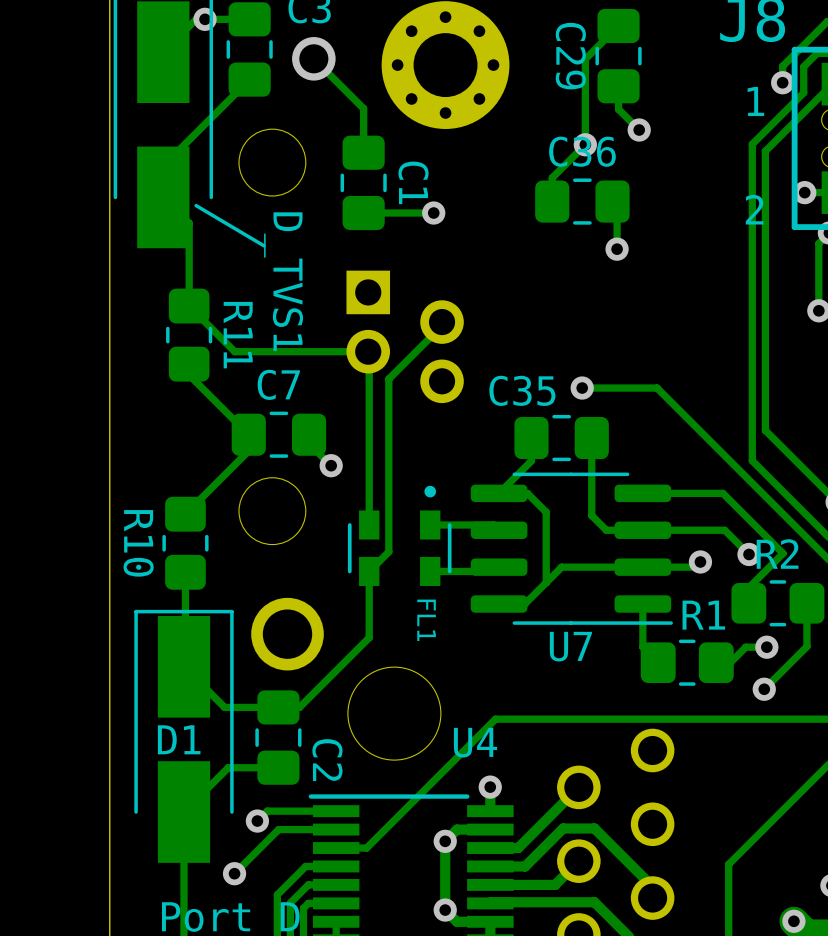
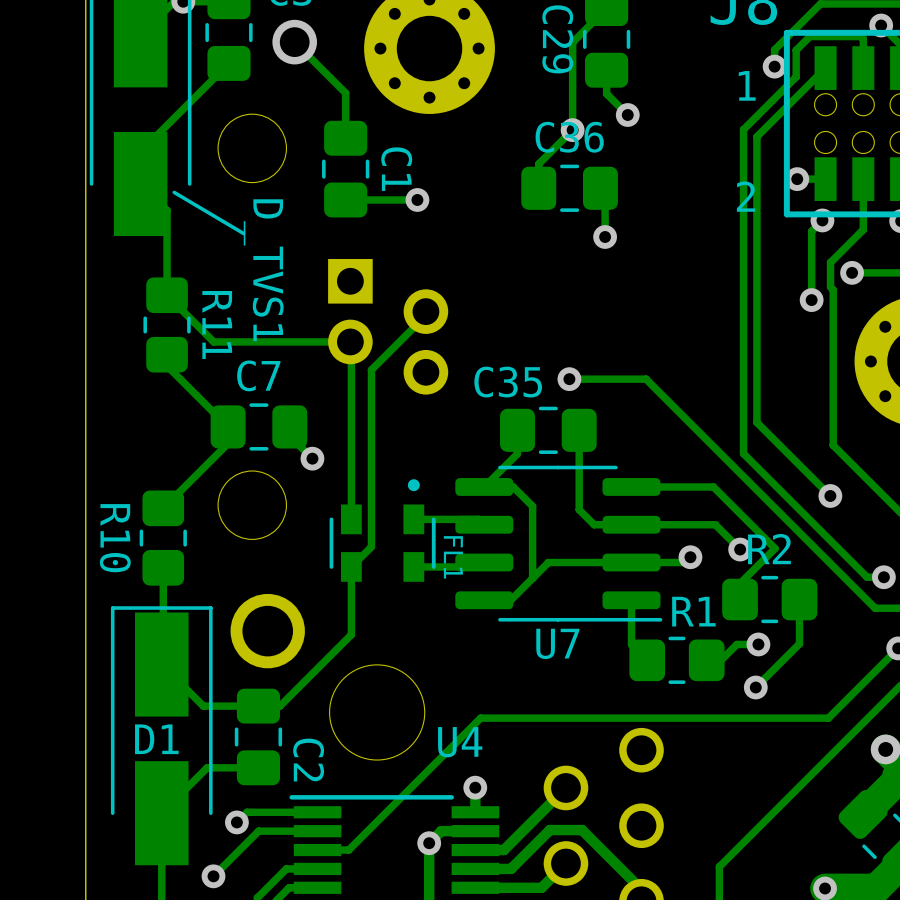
FL1 name position: FL1 (426, 620) -> FL1 (453, 557)

